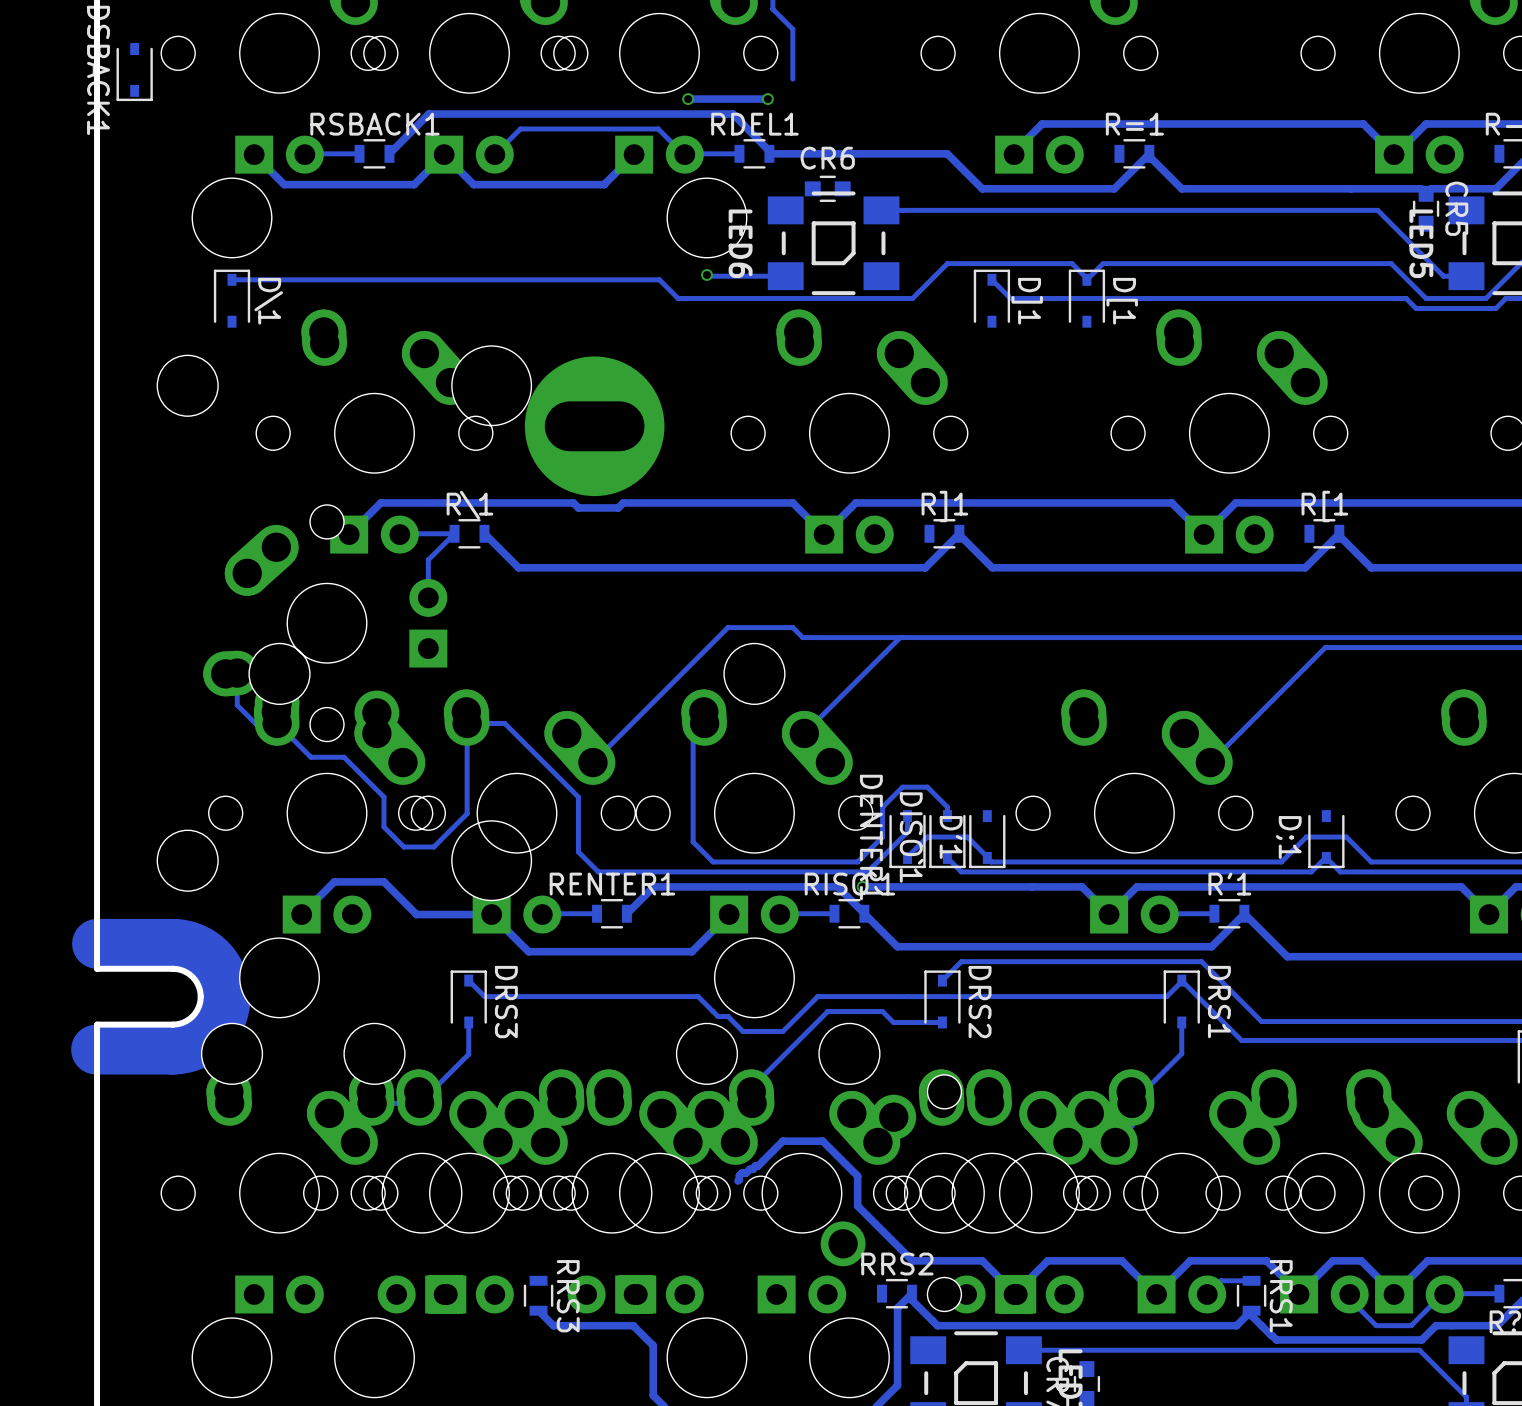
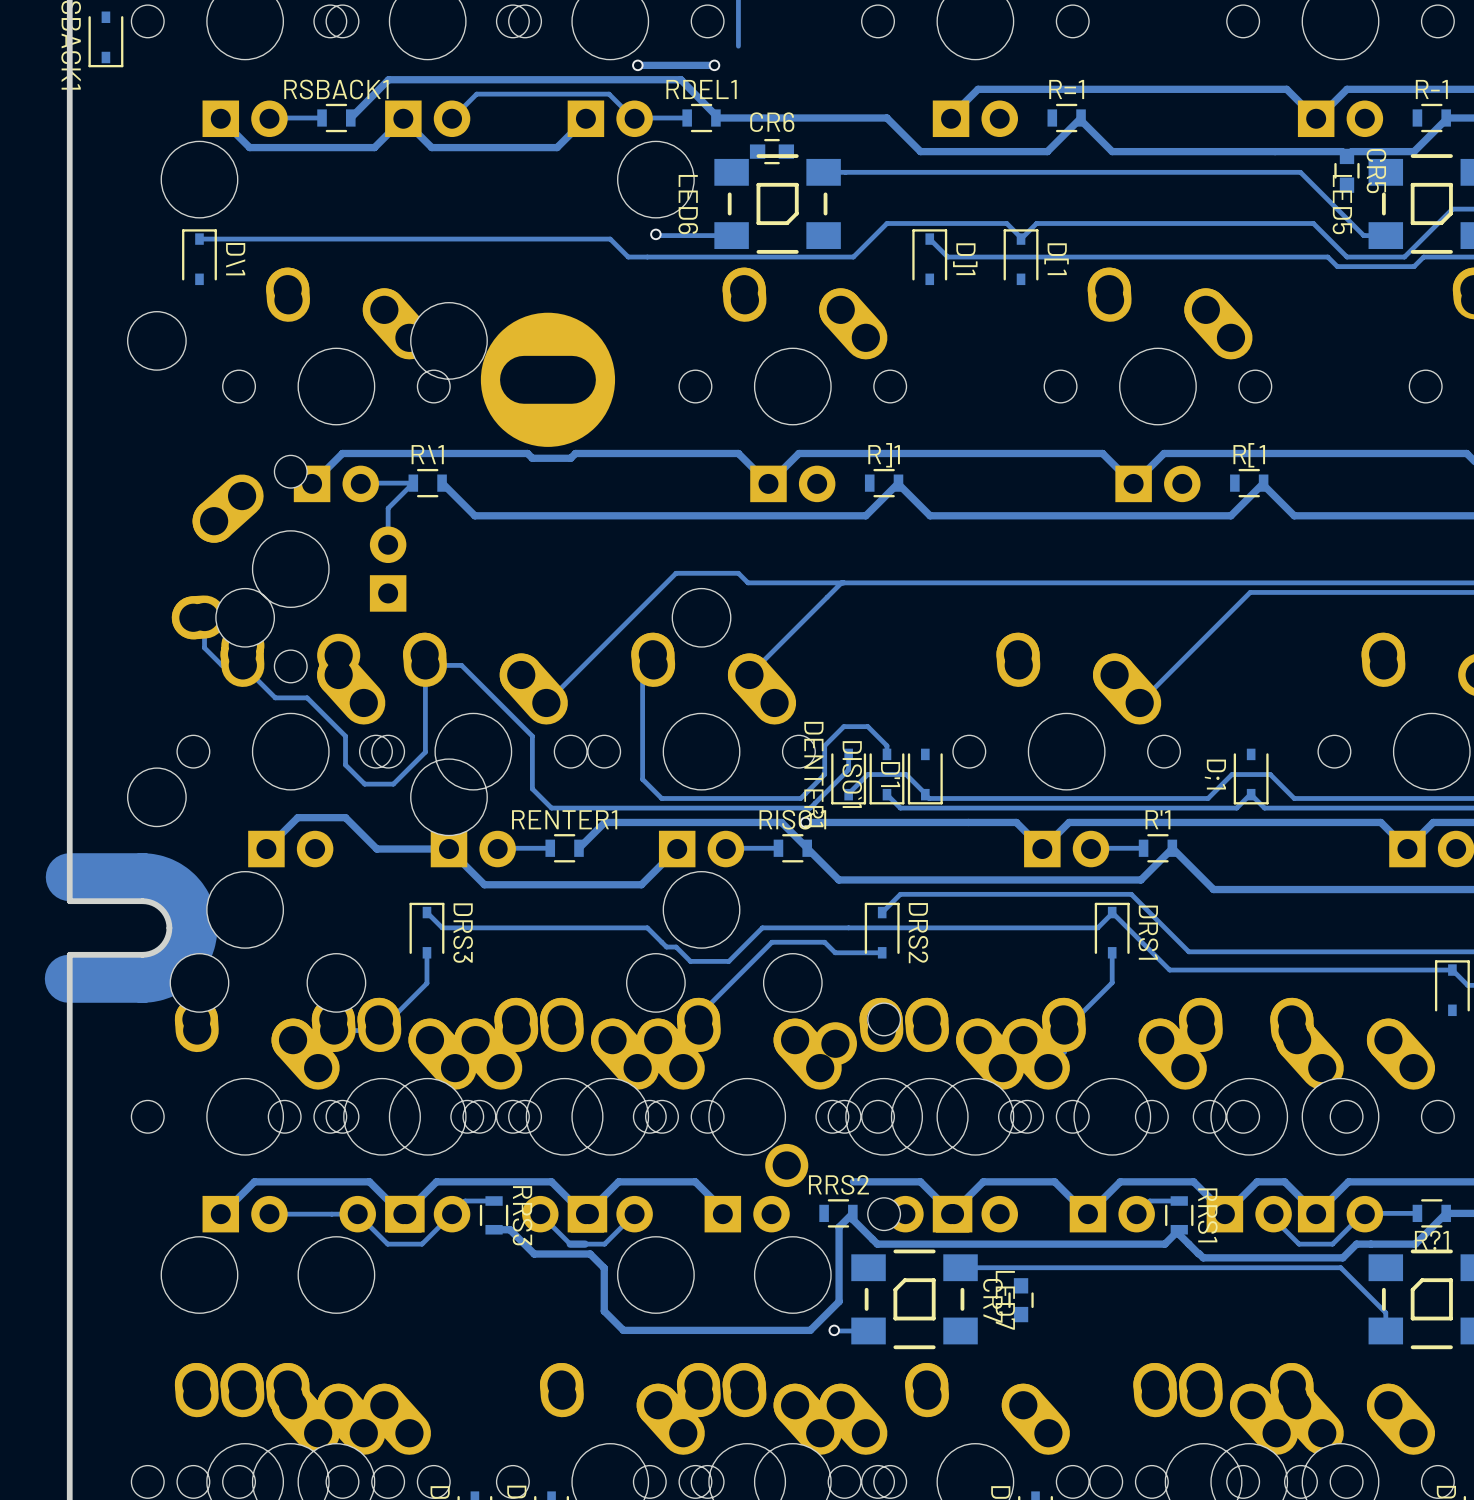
track: (738, 1181) (741, 1173) (746, 1173) (757, 1166) (782, 1141) (822, 1141) (857, 1176) (857, 1206) (912, 1260) -> none
track: none -> (494, 1201) (465, 1201) (422, 1244) (387, 1244) (357, 1214) (269, 1214)
track: none -> (540, 1214) (570, 1244)
track: none -> (596, 1214) (583, 1214) (551, 1181) (436, 1181) (404, 1214) (401, 1214) (369, 1181) (254, 1181) (220, 1214)
track: none -> (722, 1214) (722, 1209) (695, 1181) (618, 1181) (588, 1211) (588, 1214)
track: (538, 1310) (553, 1325) (617, 1325) -> (494, 1229) (509, 1229) (534, 1254) (590, 1254) (604, 1268)
track: (633, 1325) (653, 1345) (653, 1350) -> (585, 1244) (604, 1244) (634, 1214)

